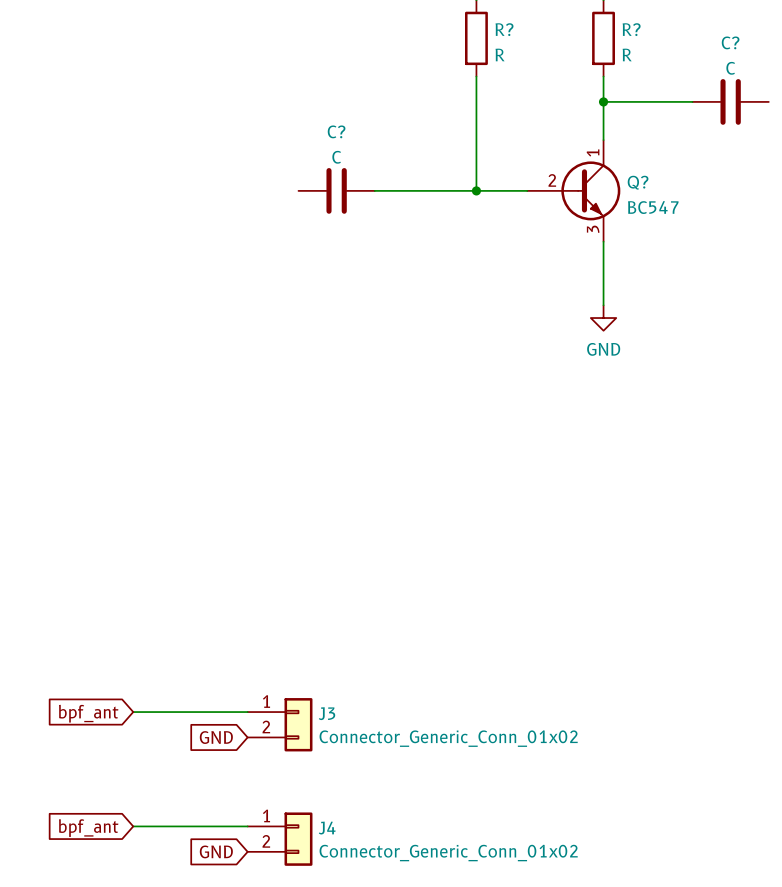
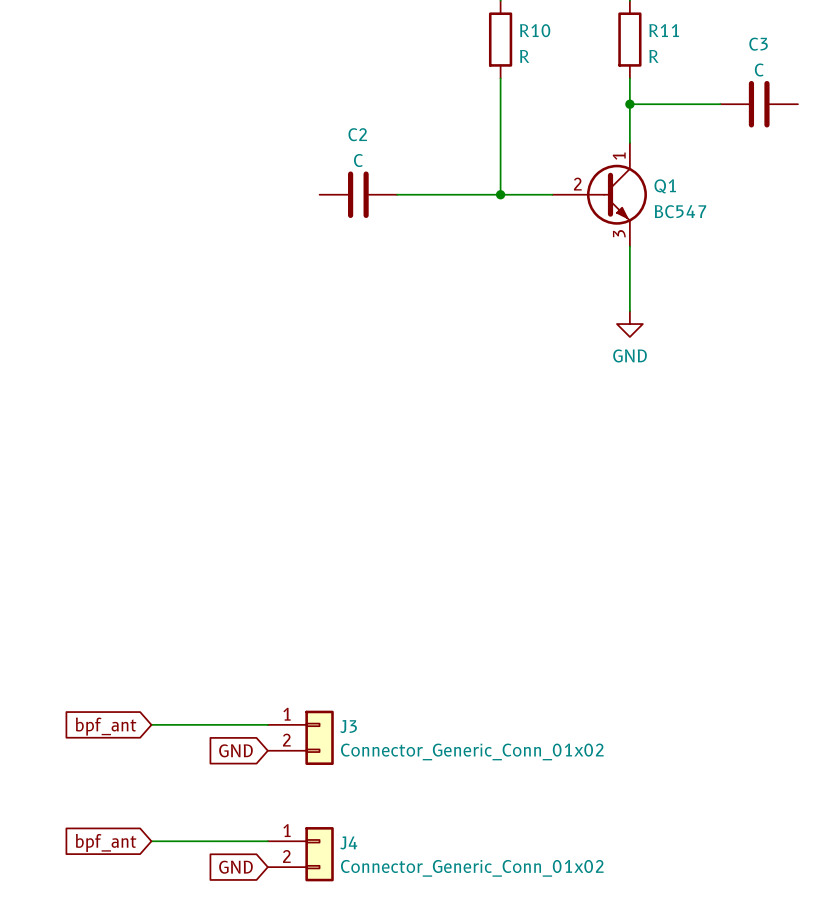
R? name: R? (504, 29) -> R10 (535, 30)
R? name: R? (631, 29) -> R11 (664, 30)
C? name: C? (730, 42) -> C3 (758, 44)
C? name: C? (336, 131) -> C2 (357, 134)
Q? name: Q? (638, 182) -> Q1 (665, 186)

